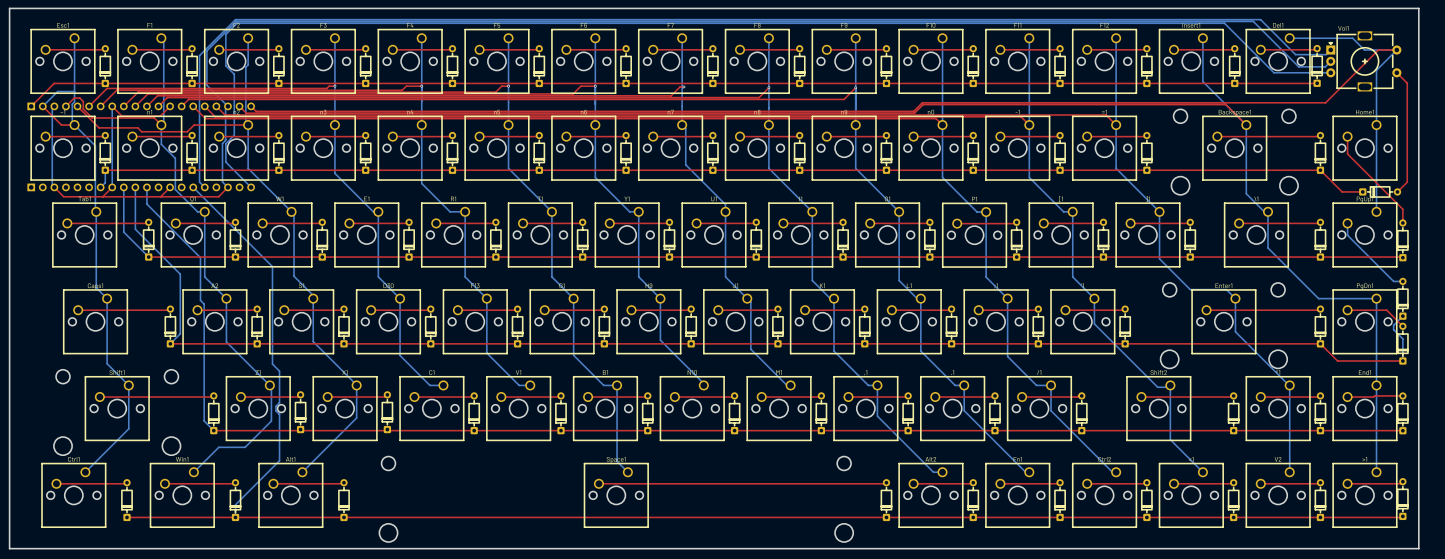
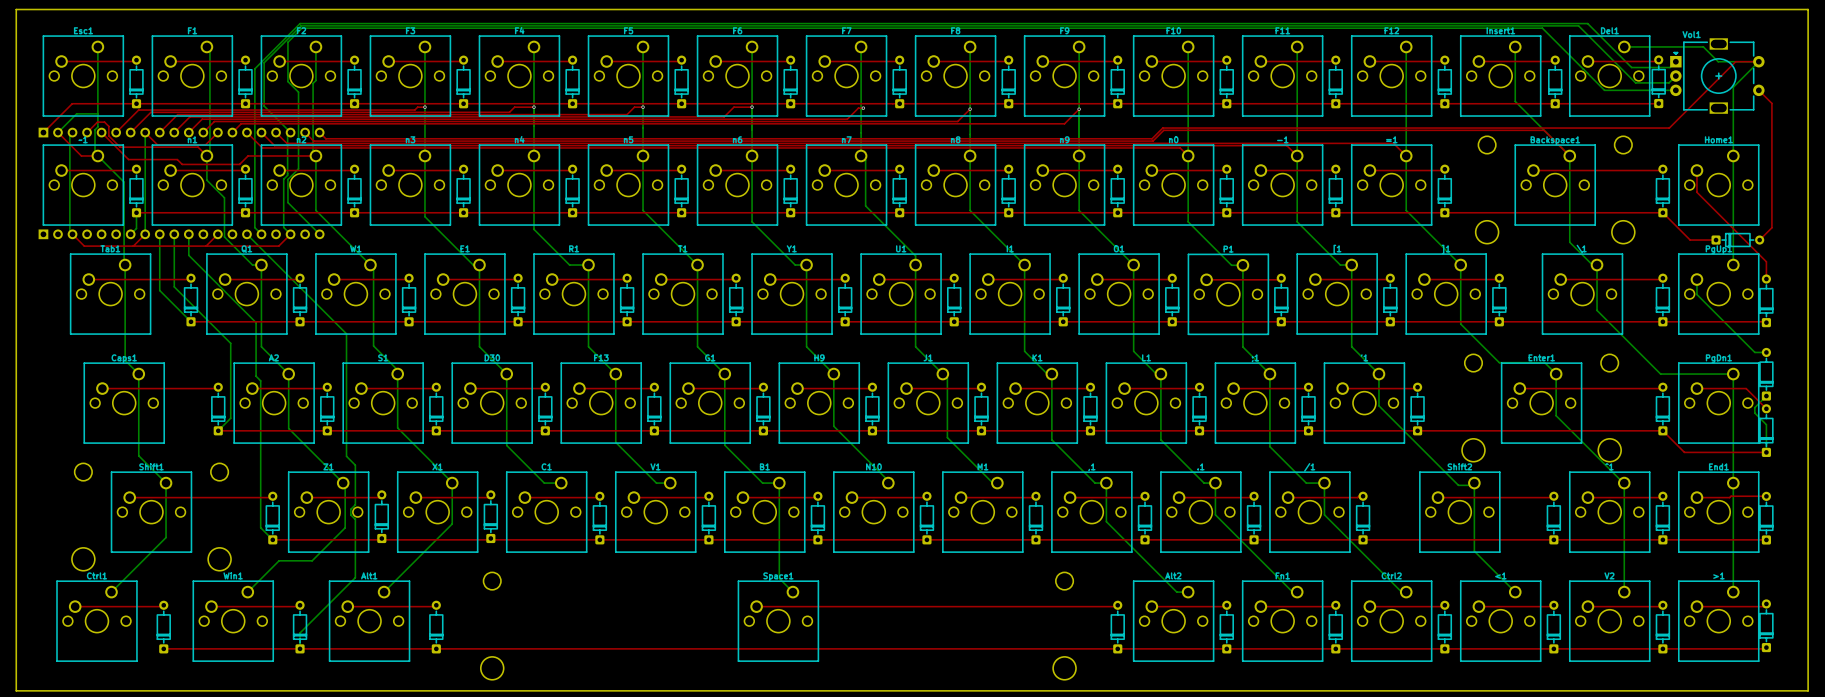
board edge: (1418, 8) (1418, 548) (9, 548) -> (1786, 9) (1808, 9) (1808, 690) (16, 690) (16, 688)

